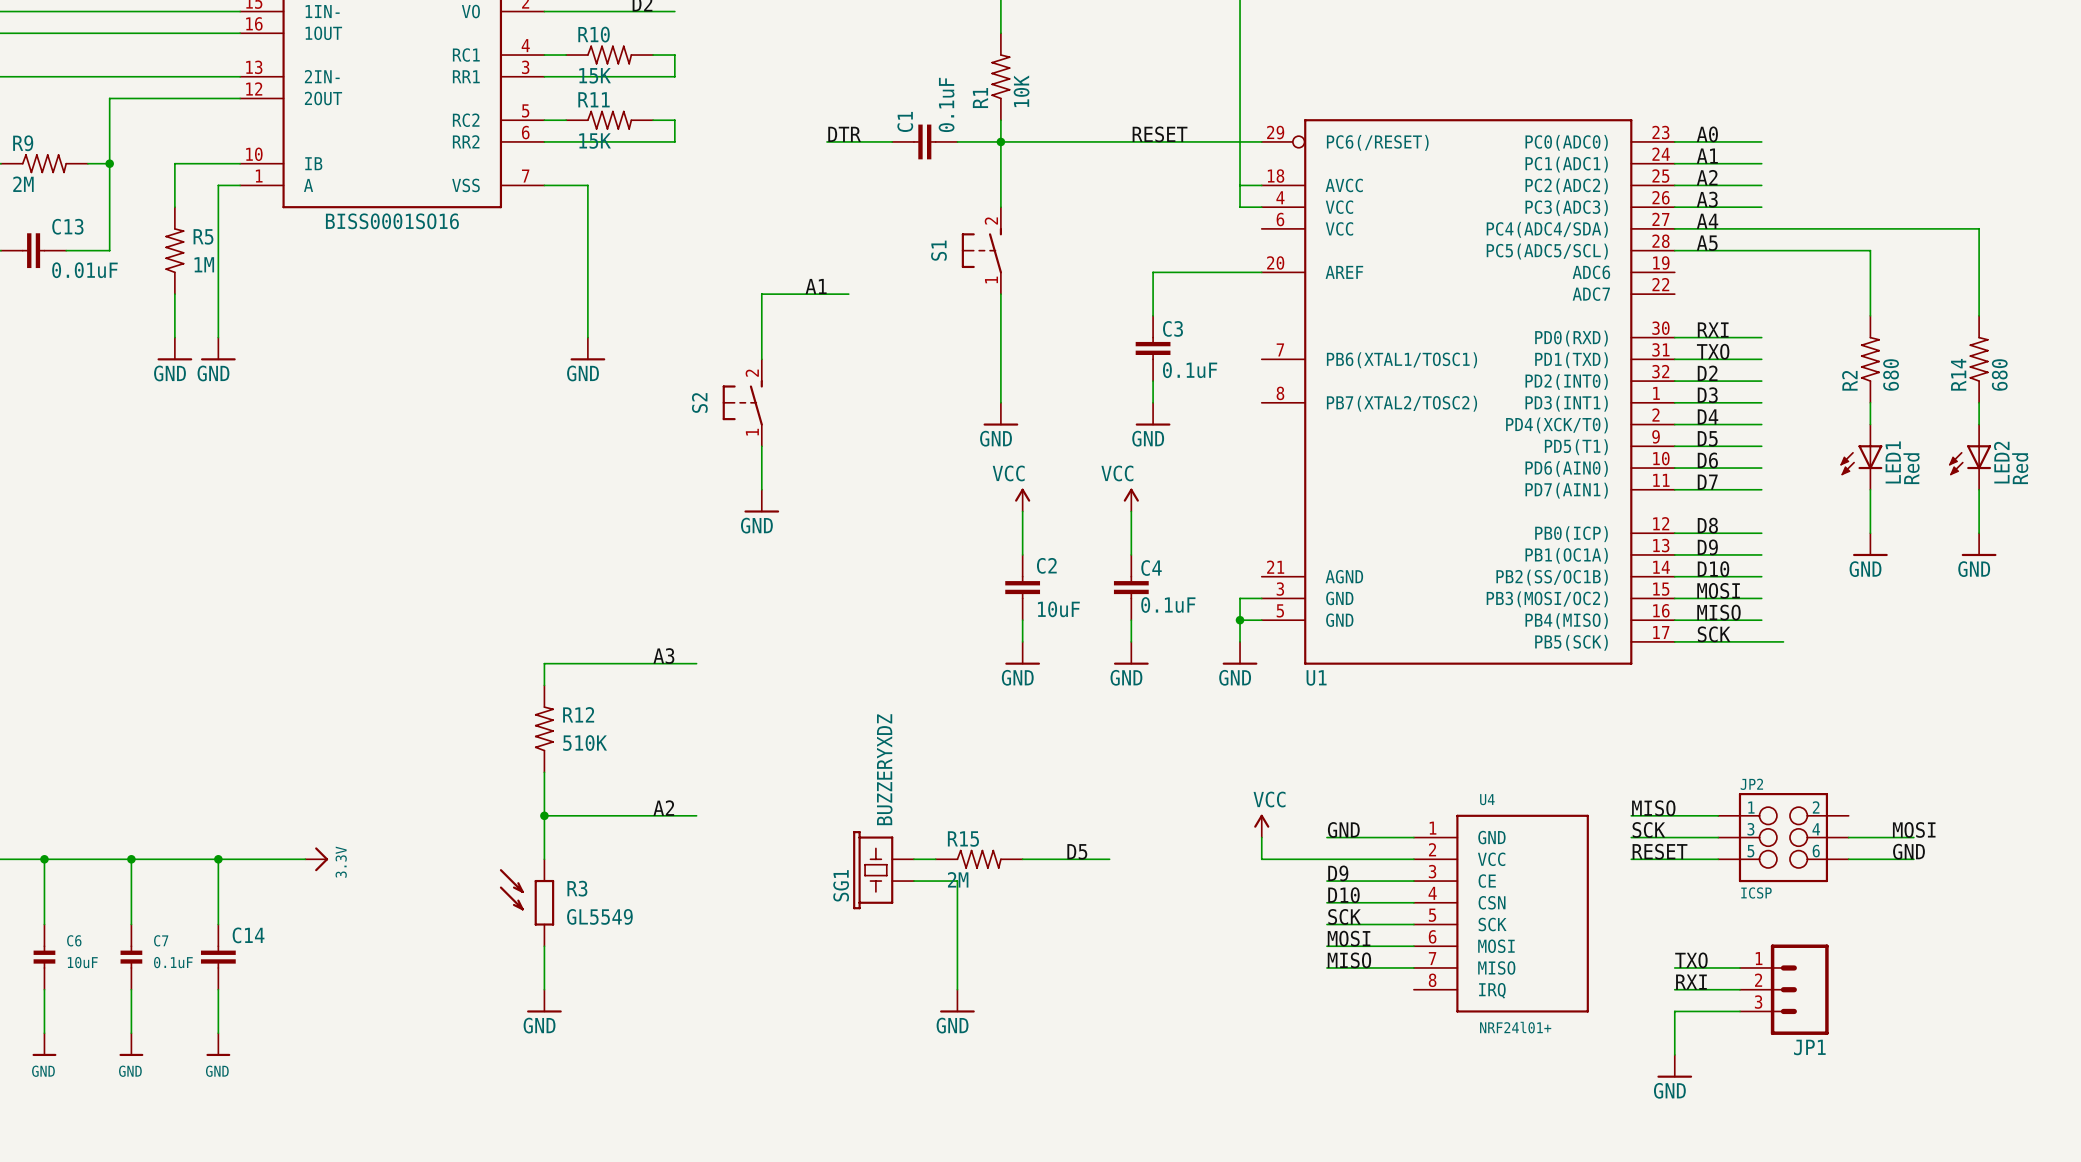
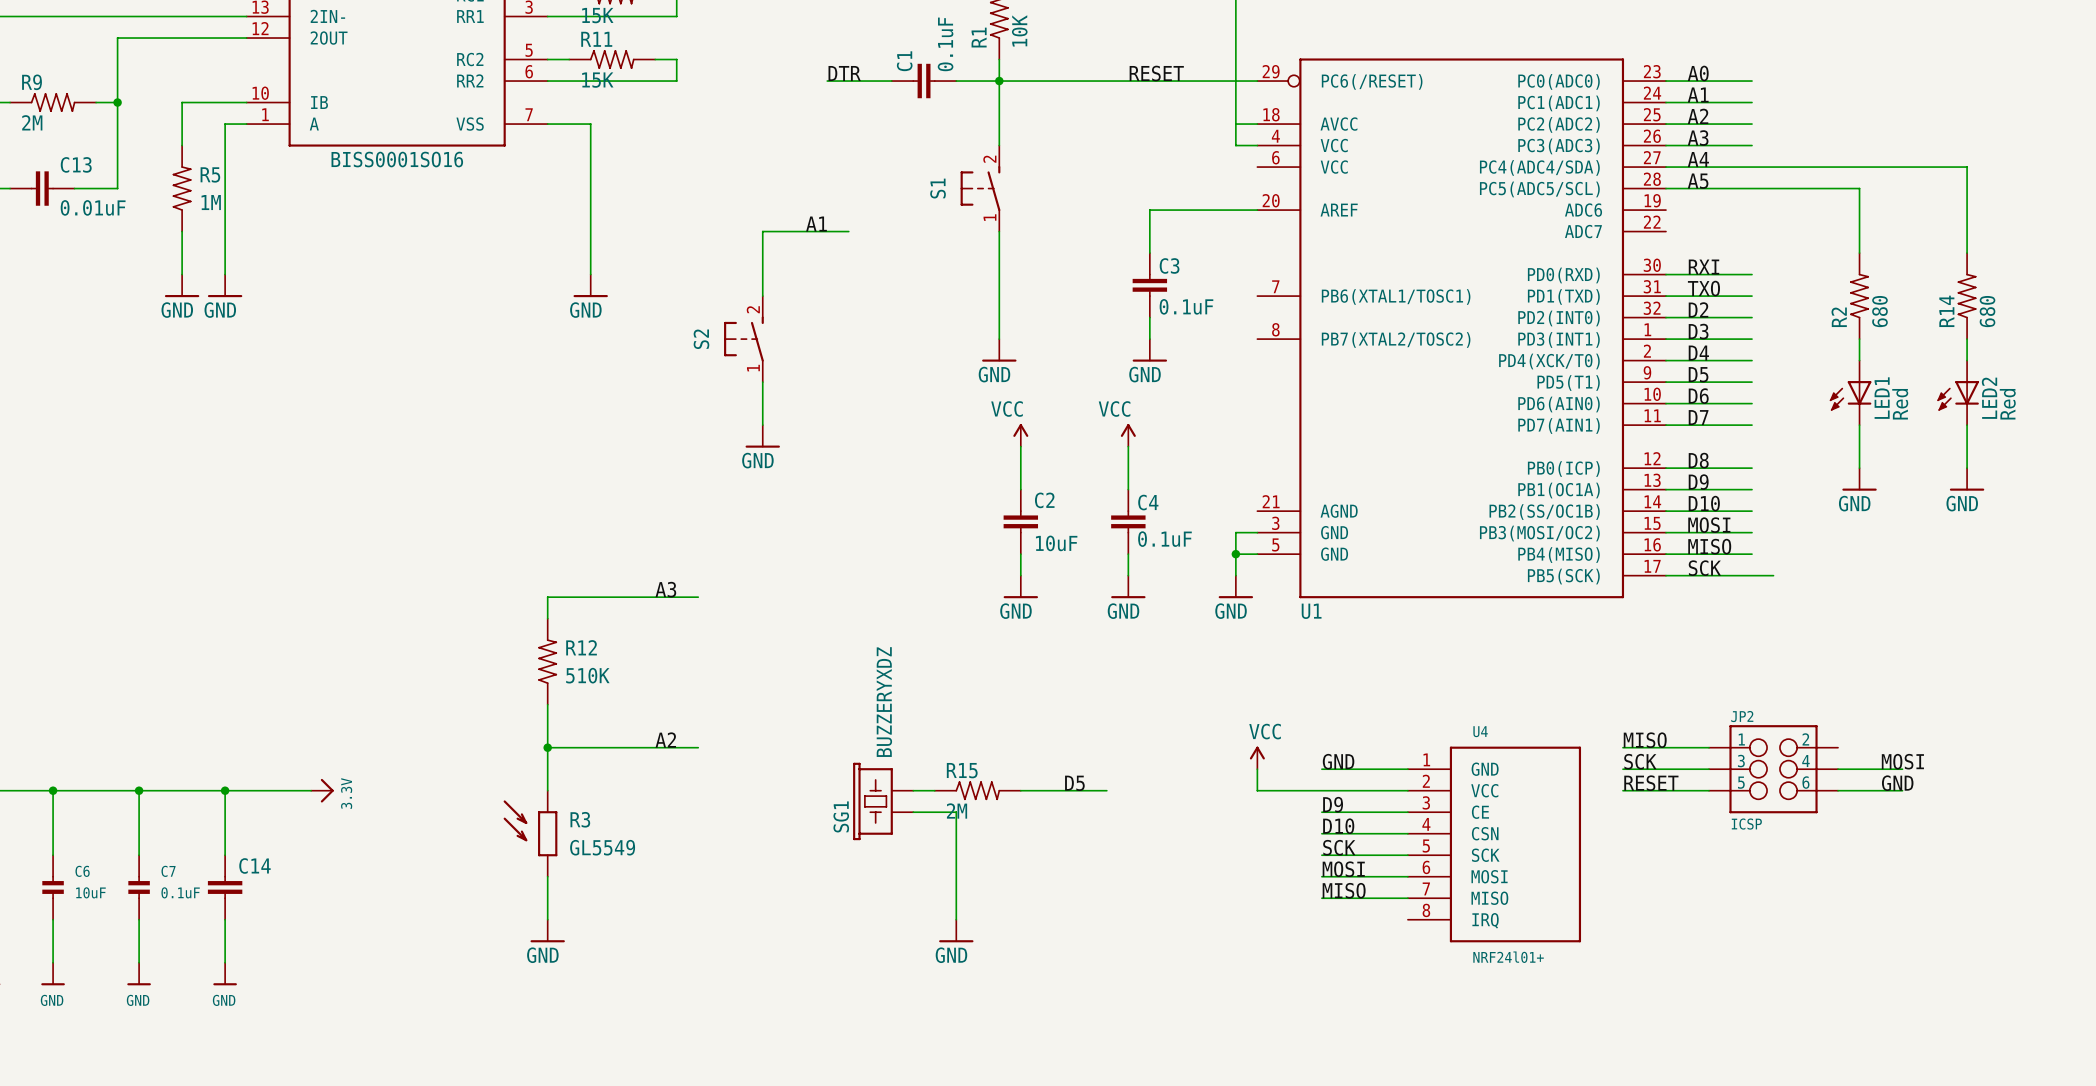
label: TXO (1691, 960) -> none
wire: (1674, 967) (1739, 967) -> none
label: RXI (1691, 982) -> none
wire: (1674, 989) (1739, 989) -> none
JP1: (1784, 989) -> none
wire: (1739, 1011) (1674, 1011) (1674, 1054) -> none
power symbol: GND (1674, 1066) -> none

